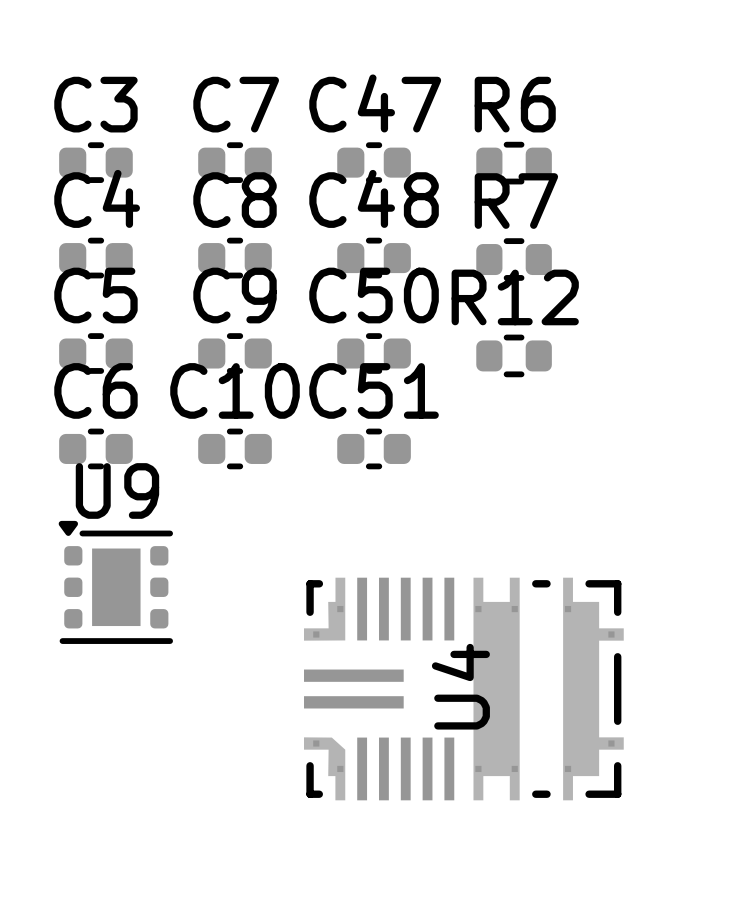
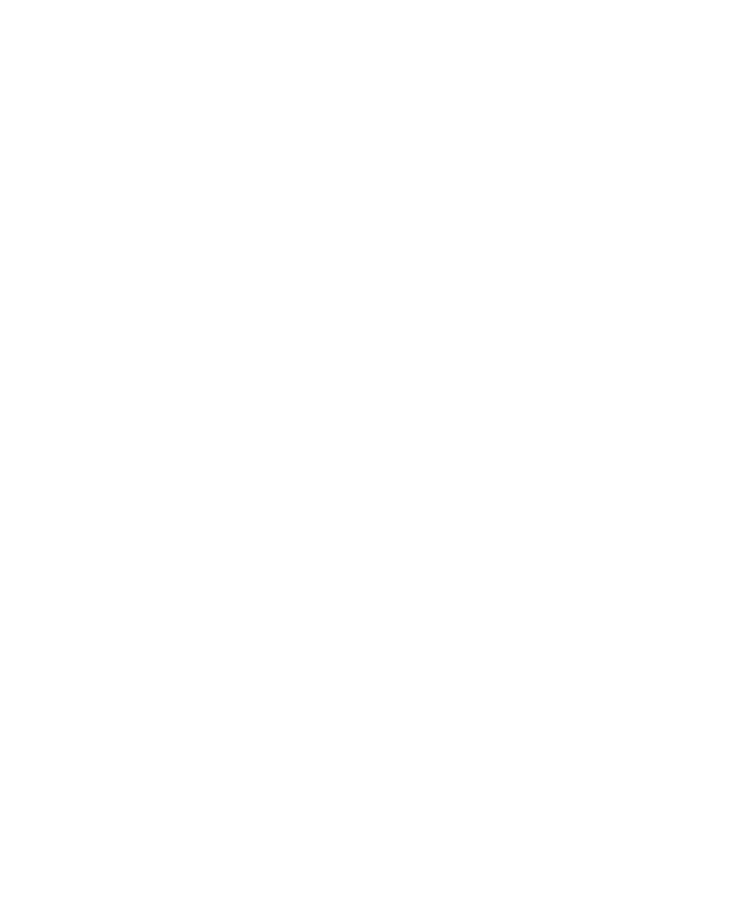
C3: (95, 162) -> none
C7: (235, 162) -> none
C47: (374, 162) -> none
R6: (514, 163) -> none
C4: (95, 258) -> none
C8: (235, 258) -> none
C48: (374, 258) -> none
R7: (514, 259) -> none
C5: (95, 353) -> none
C9: (235, 353) -> none
C50: (374, 353) -> none
R12: (514, 355) -> none
C6: (95, 448) -> none
C10: (235, 448) -> none
C51: (374, 448) -> none
U9: (115, 582) -> none
U4: (463, 689) -> none

